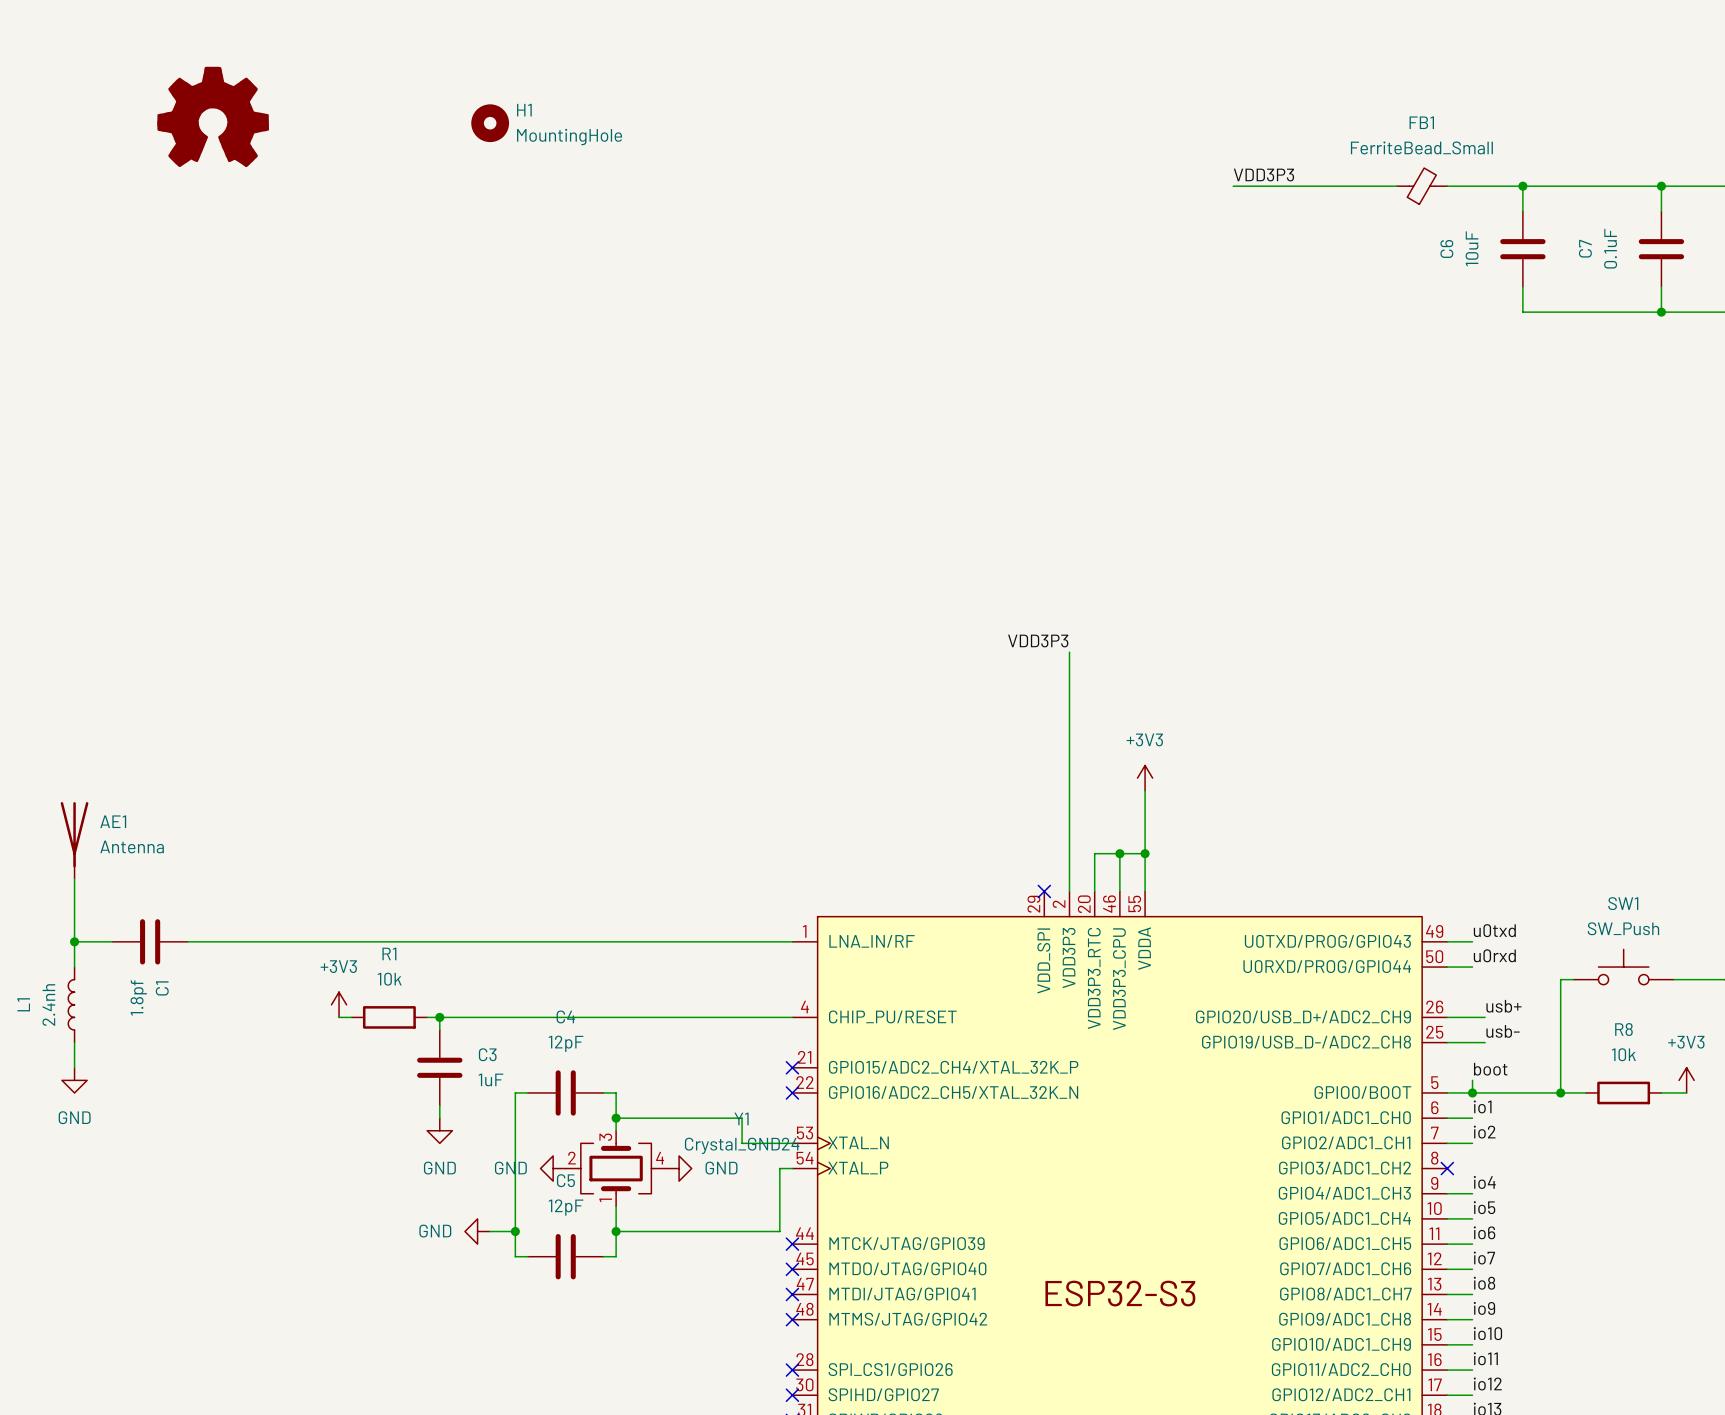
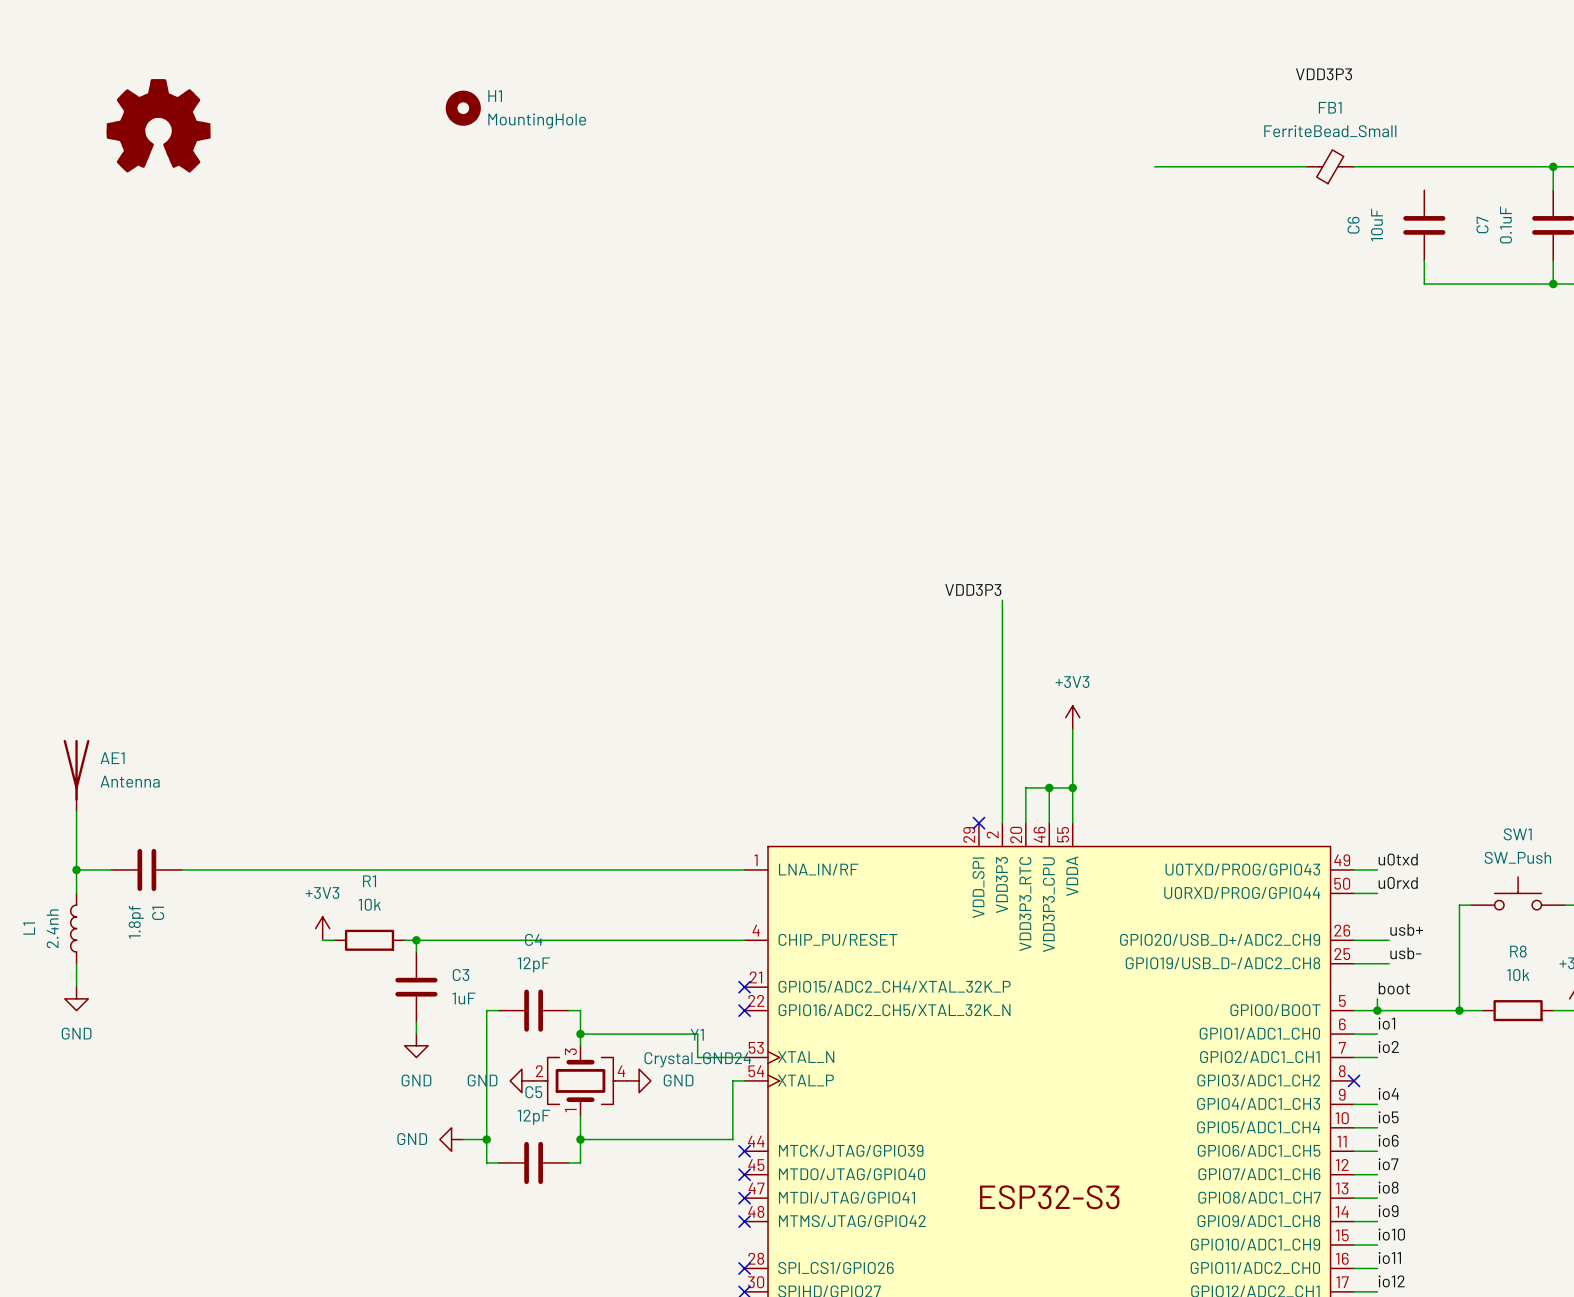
power symbol position: (213, 116) -> (158, 125)
label position: VDD3P3 (1263, 175) -> VDD3P3 (1324, 74)
wire: (1522, 186) (1522, 211) -> none
junction: (1522, 186) -> none

